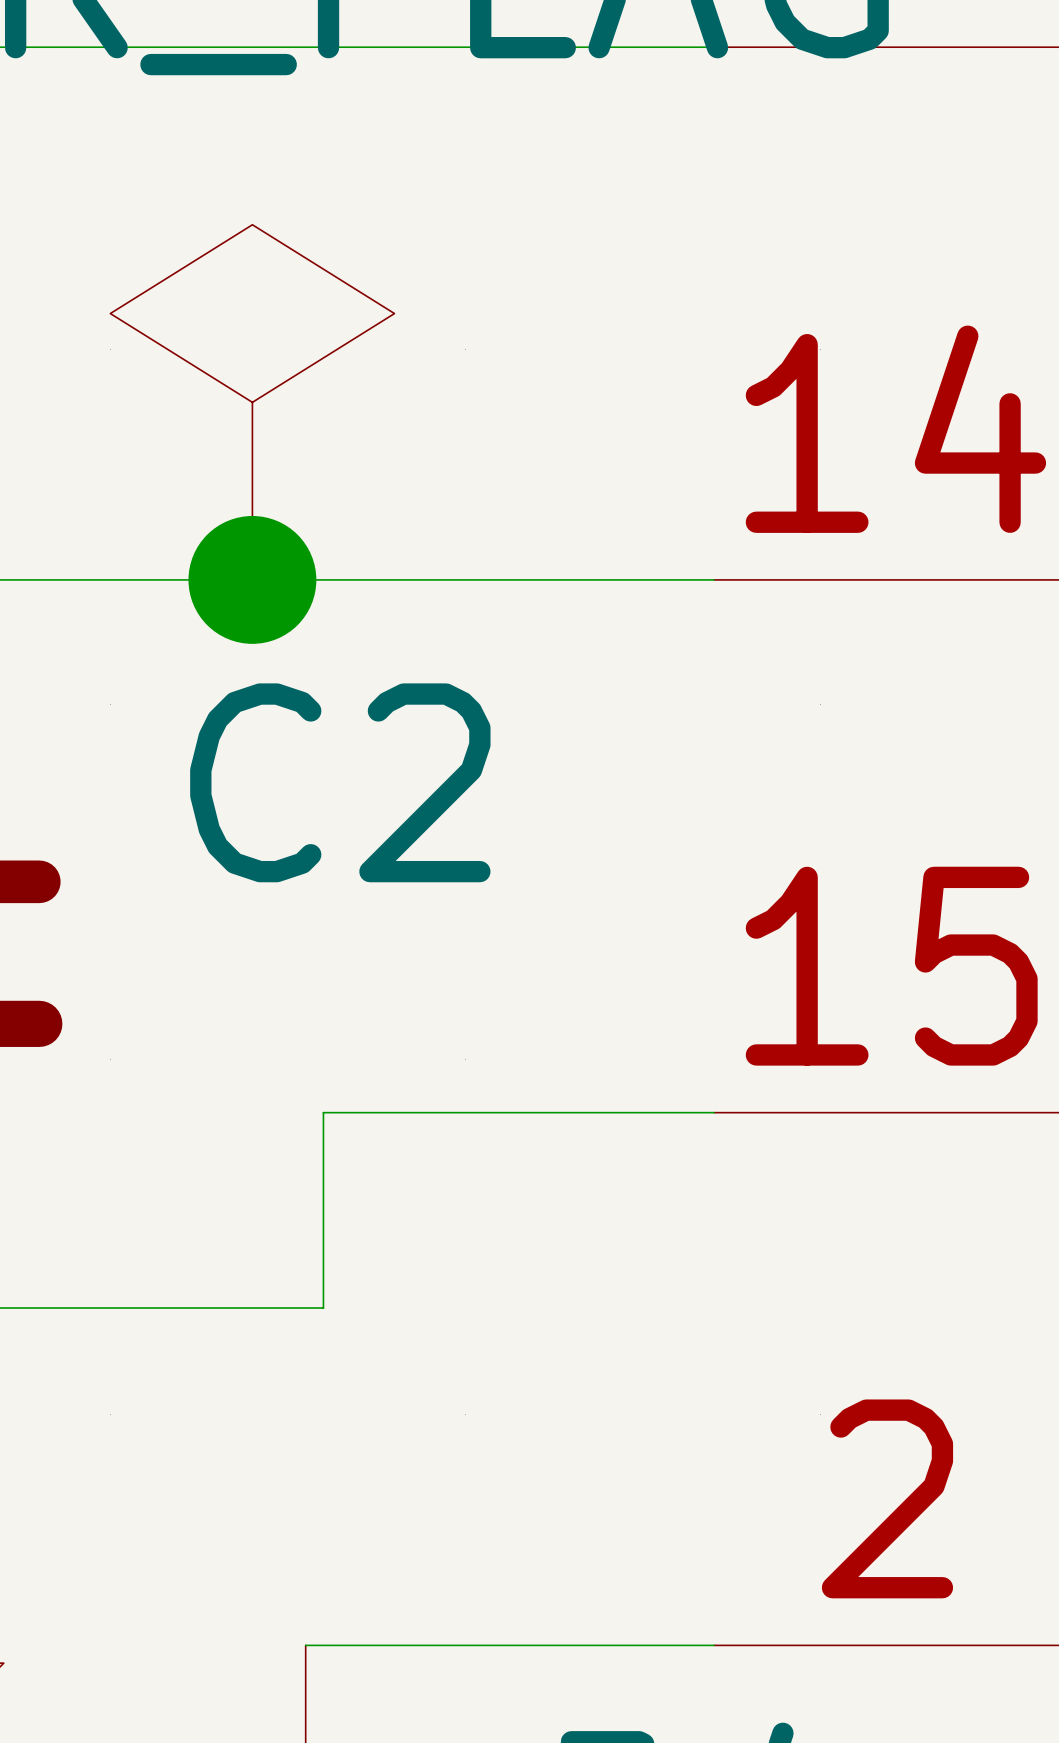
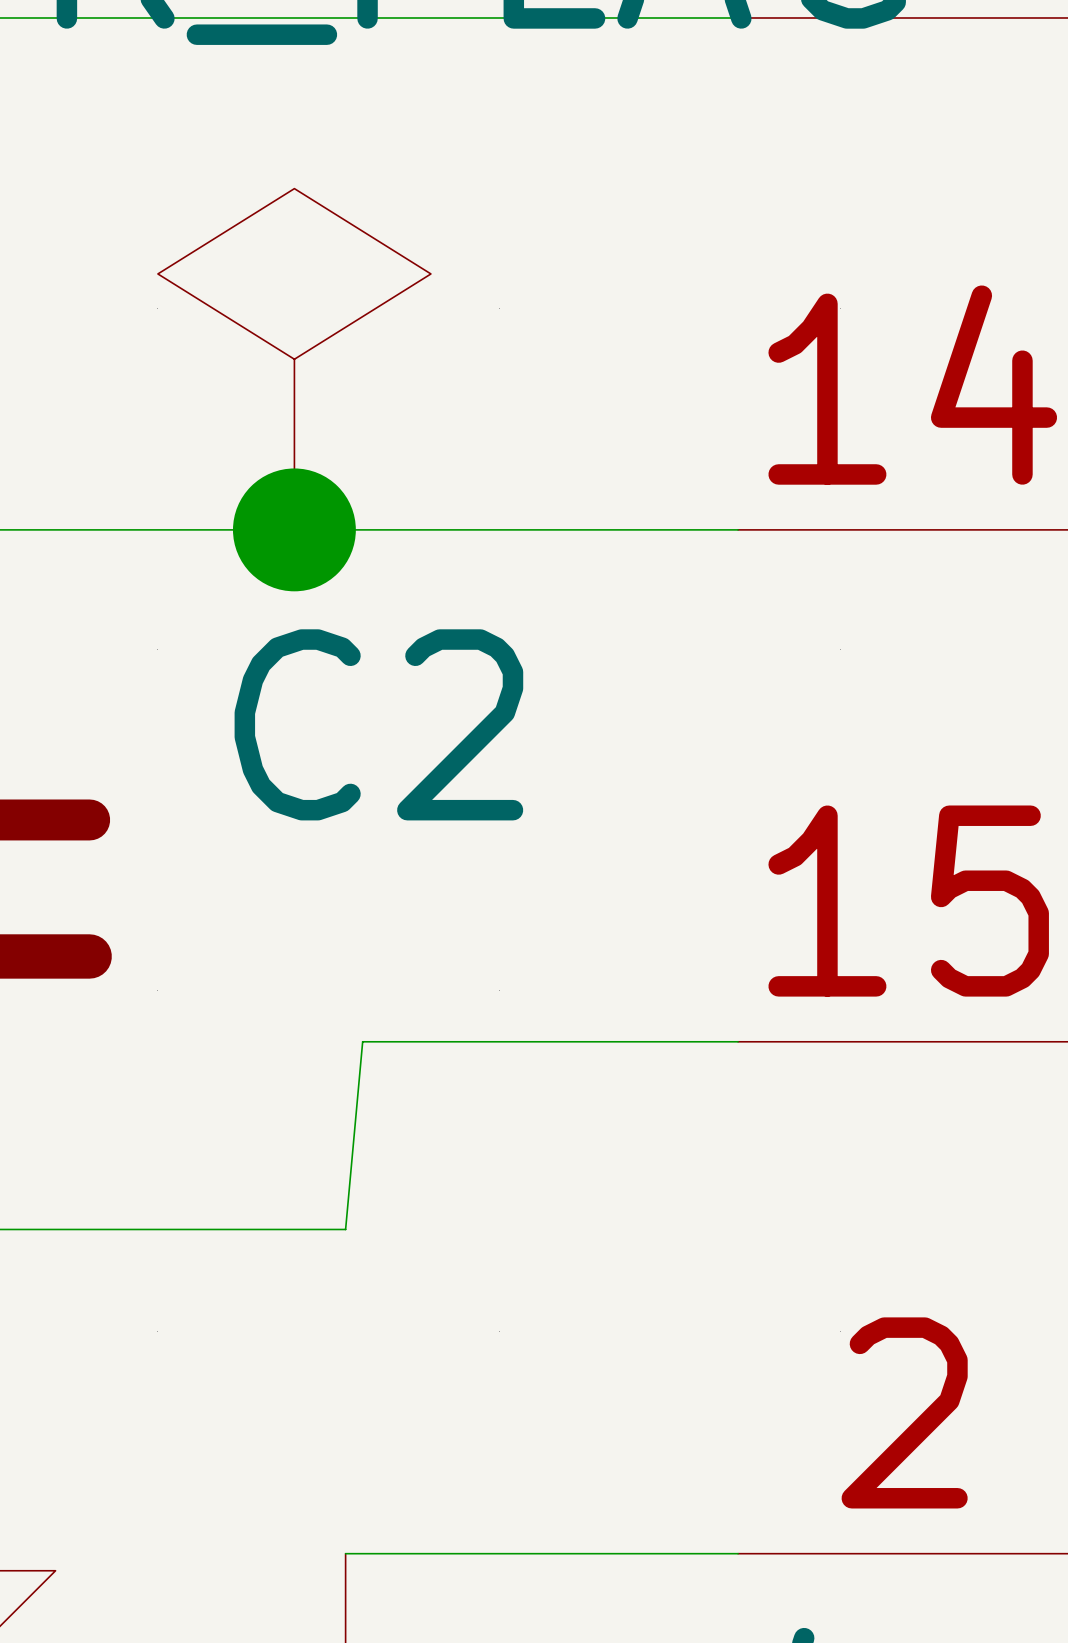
wire: (323, 1112) (323, 1307) (305, 1307) -> (362, 1041) (345, 1229)

